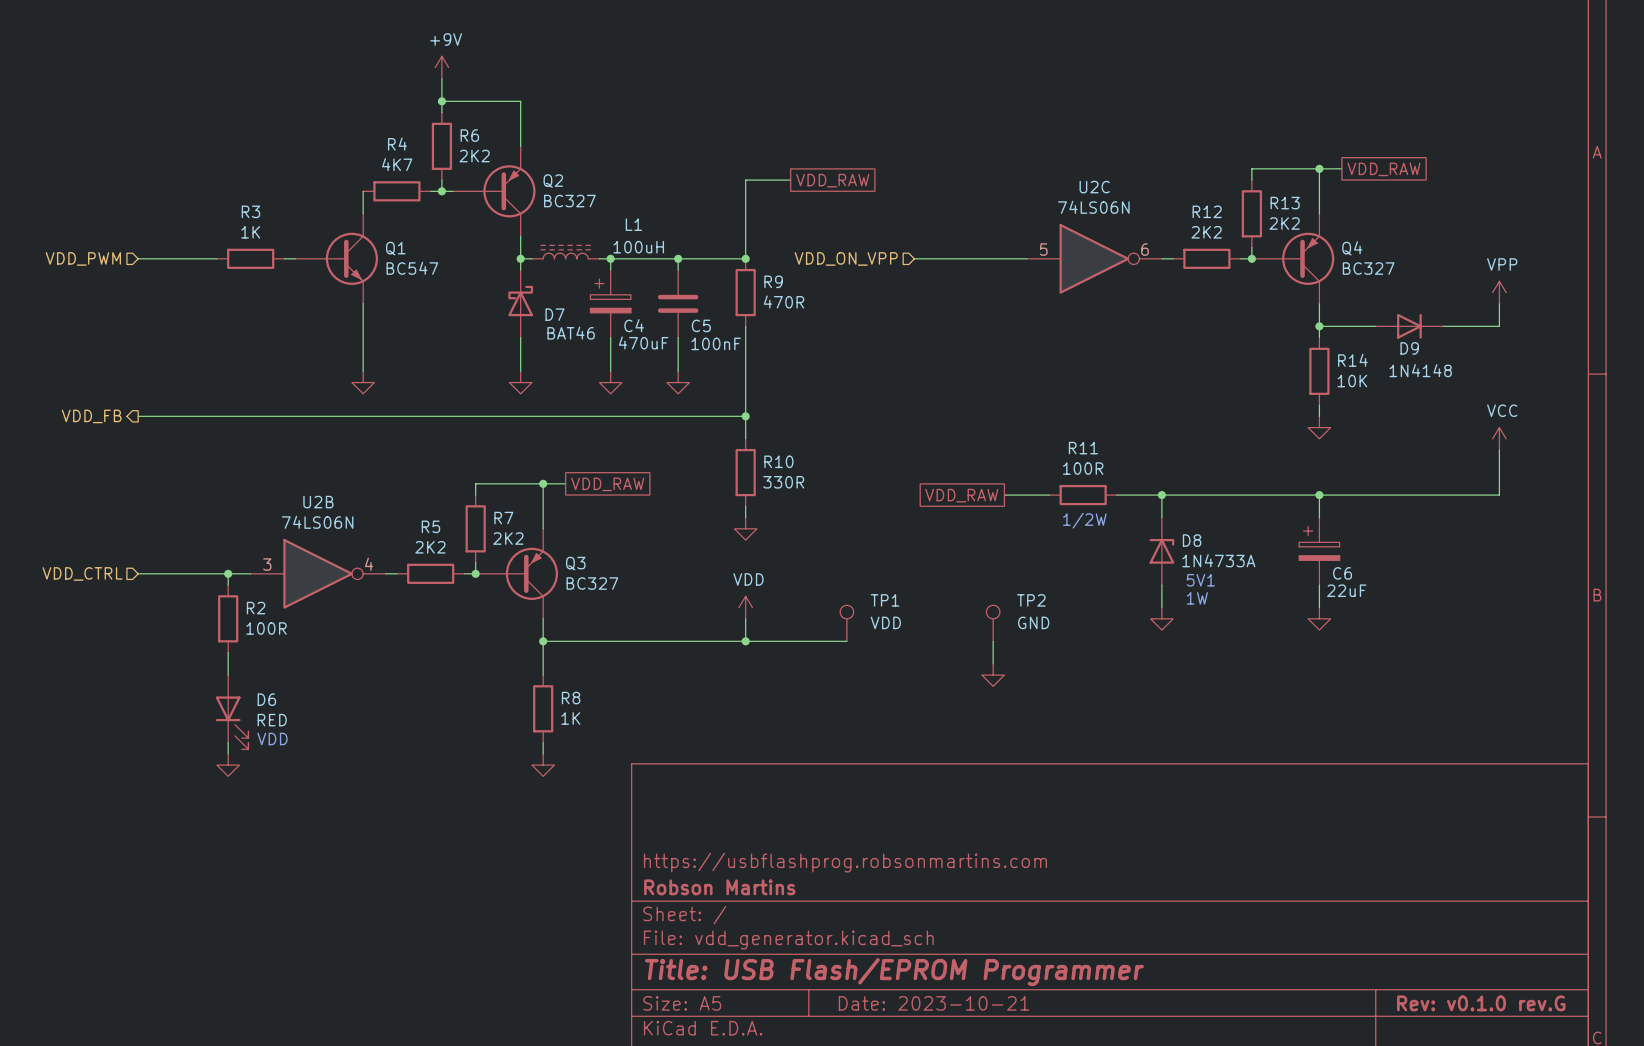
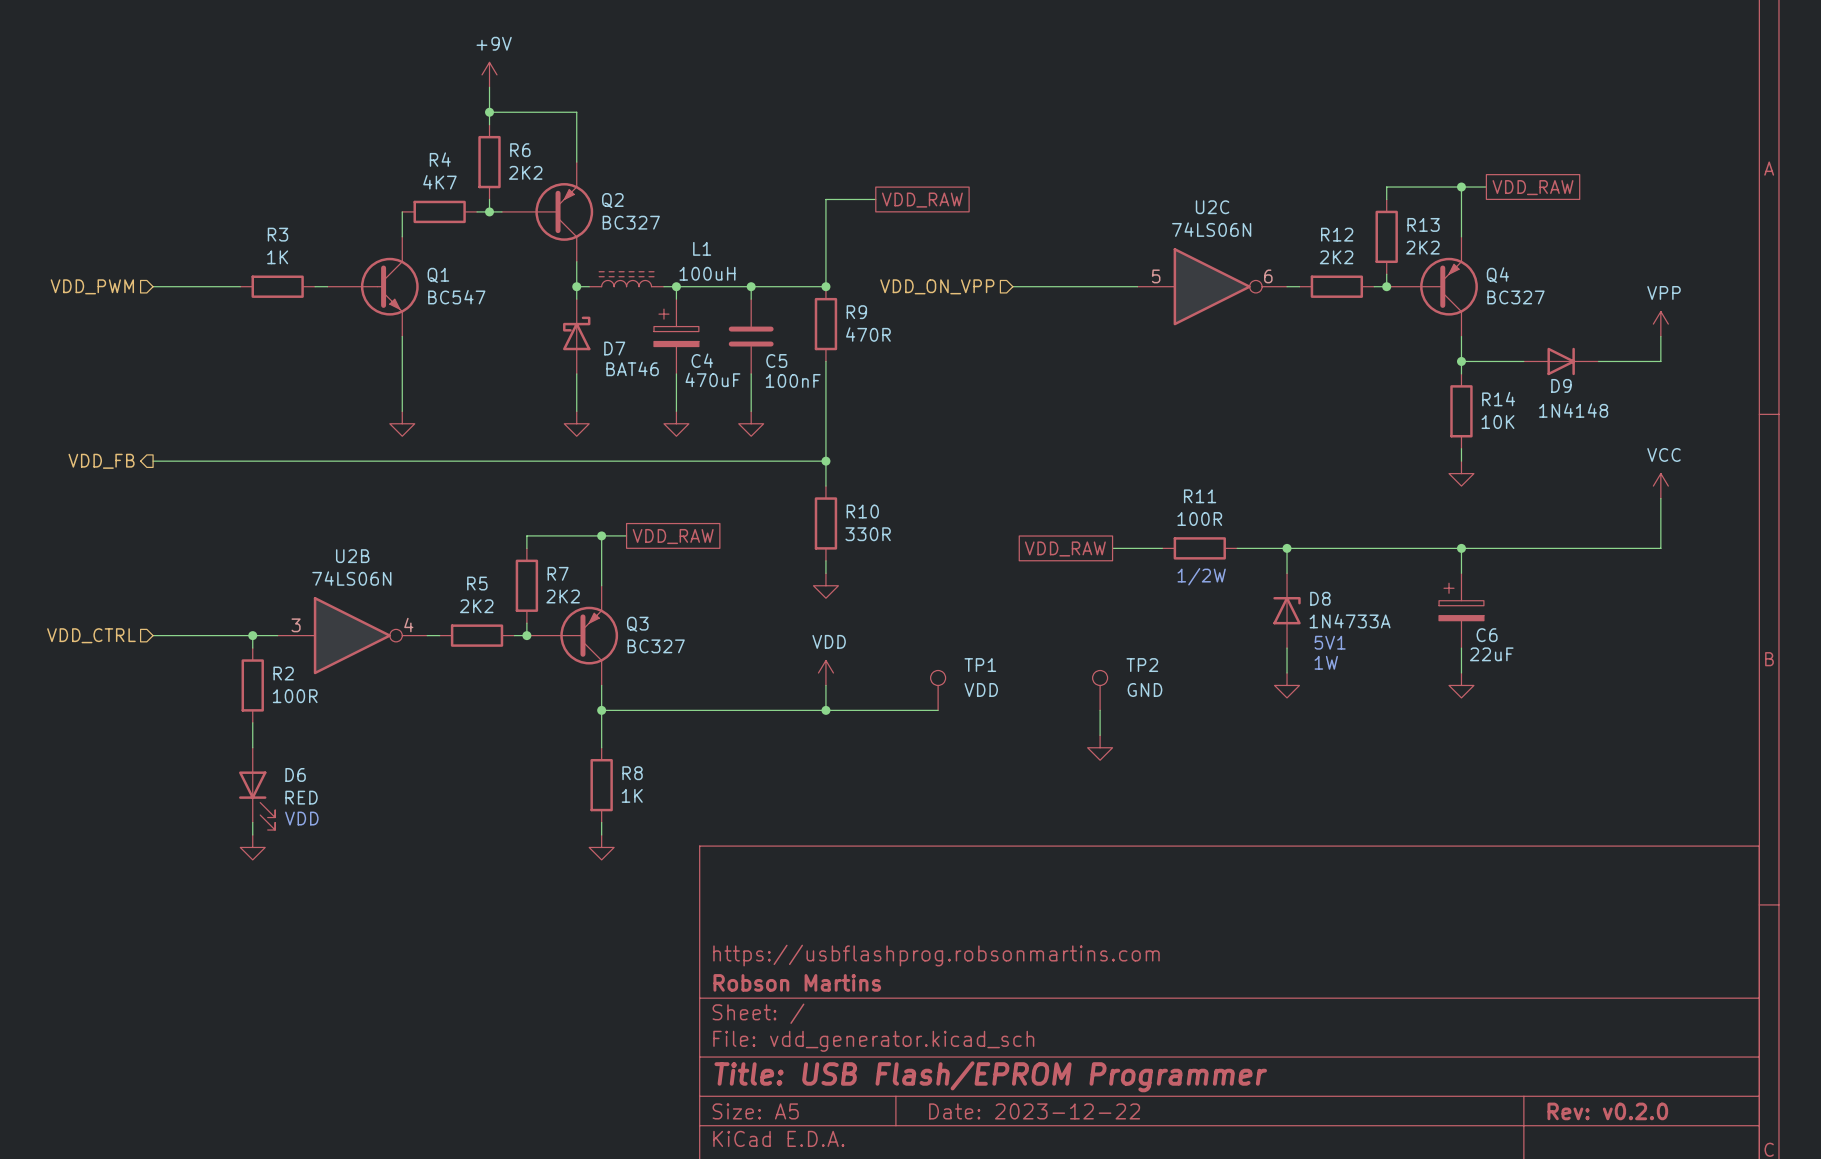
title block: Date: 2023-10-21 (934, 1003) -> Date: 2023-12-22 (1034, 1111)
title block: Rev: v0.1.0 rev.G (1481, 1003) -> Rev: v0.2.0 (1607, 1111)

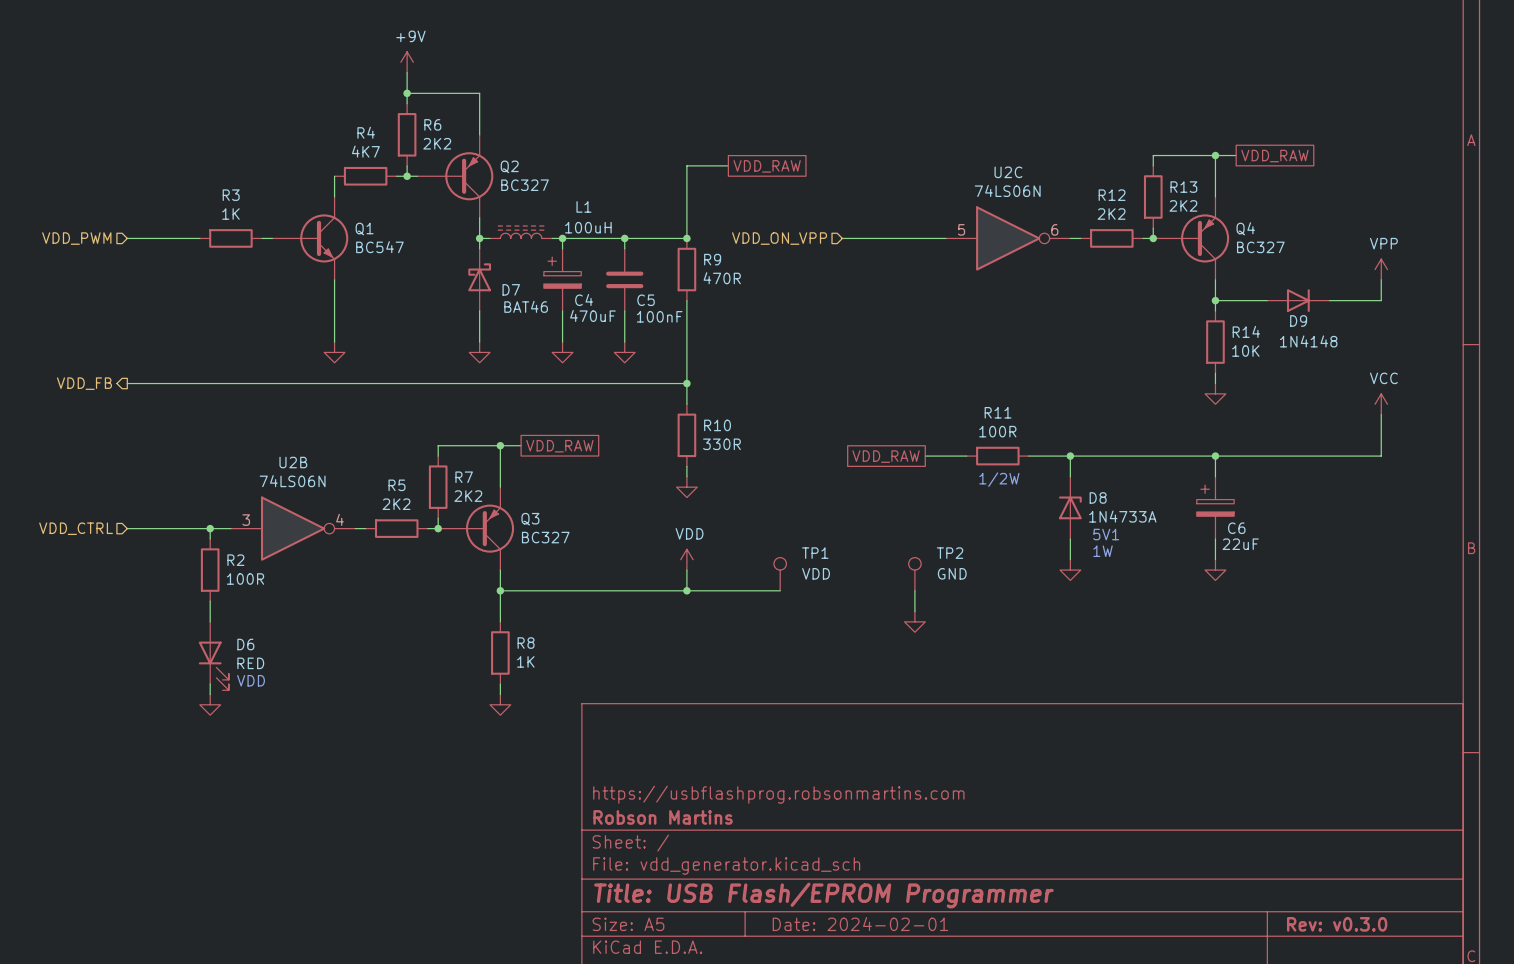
title block: Date: 2023-12-22 (1034, 1111) -> Date: 2024-02-01 (860, 924)
title block: Rev: v0.2.0 (1607, 1111) -> Rev: v0.3.0 (1337, 924)

